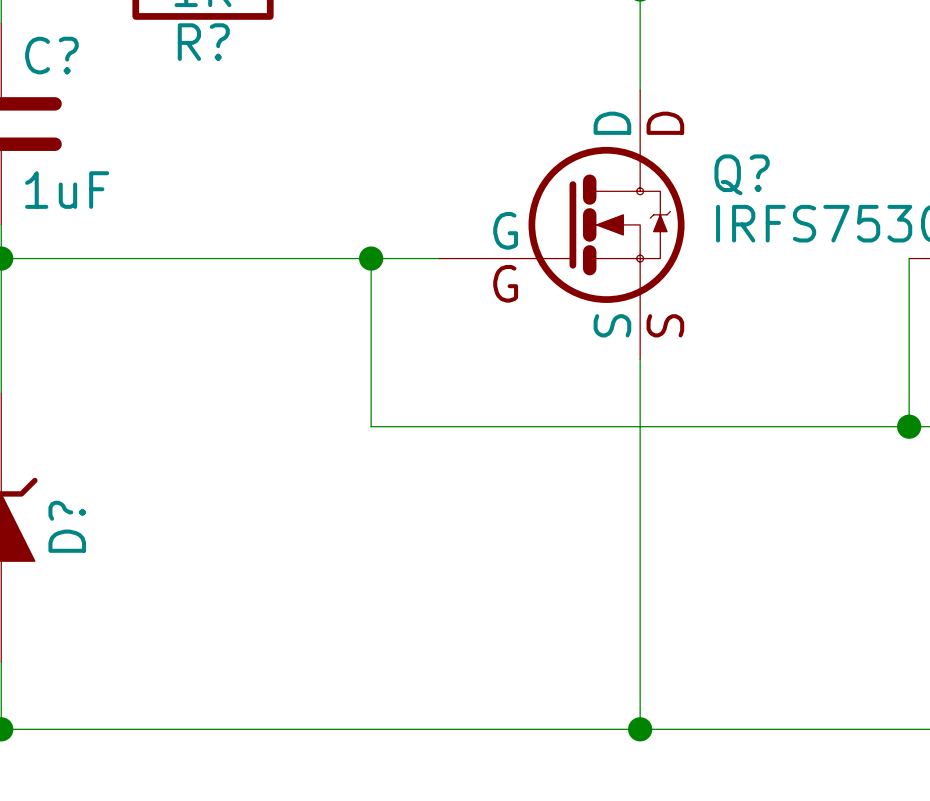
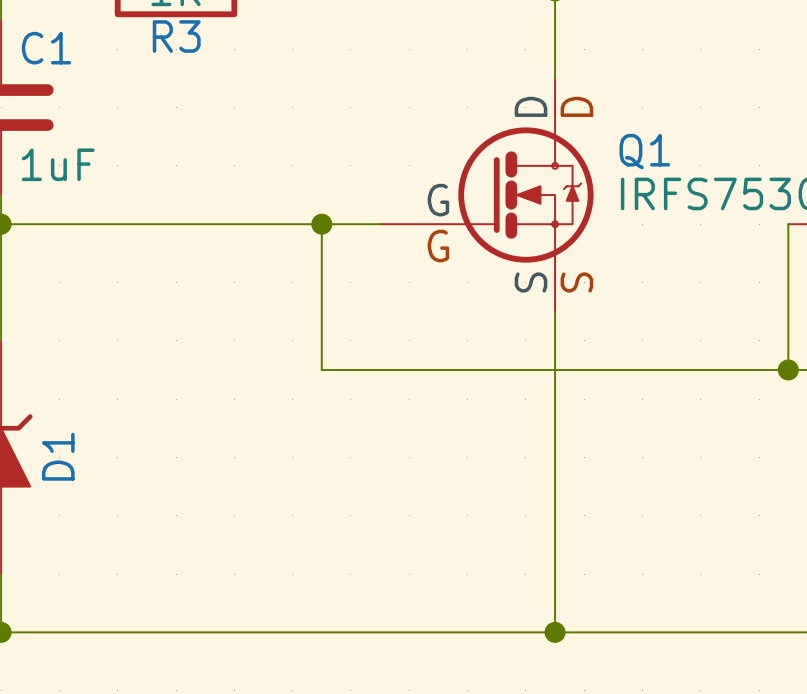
R? name: R? (203, 42) -> R3 (176, 36)
C? name: C? (51, 55) -> C1 (46, 48)
Q? name: Q? (742, 174) -> Q1 (644, 151)
D? name: D? (67, 526) -> D1 (58, 456)

